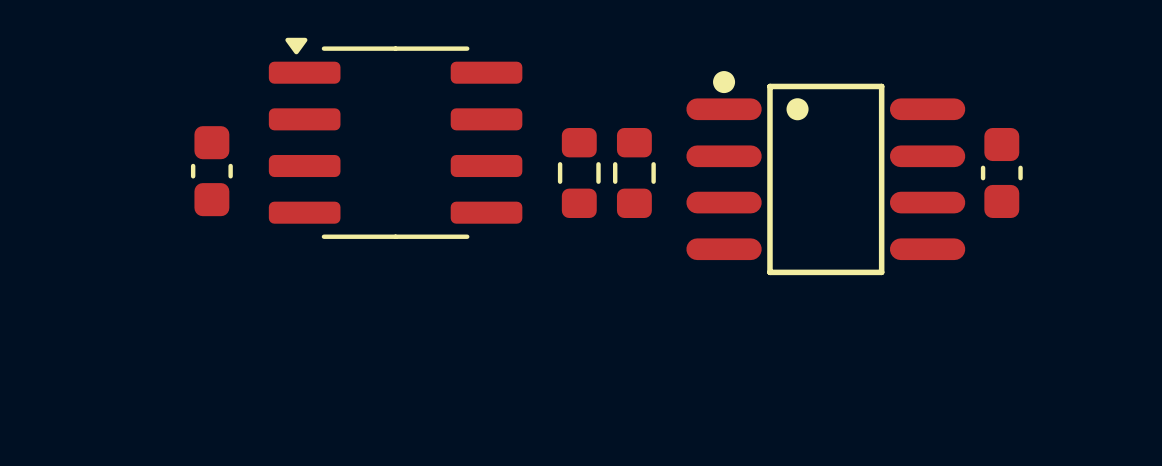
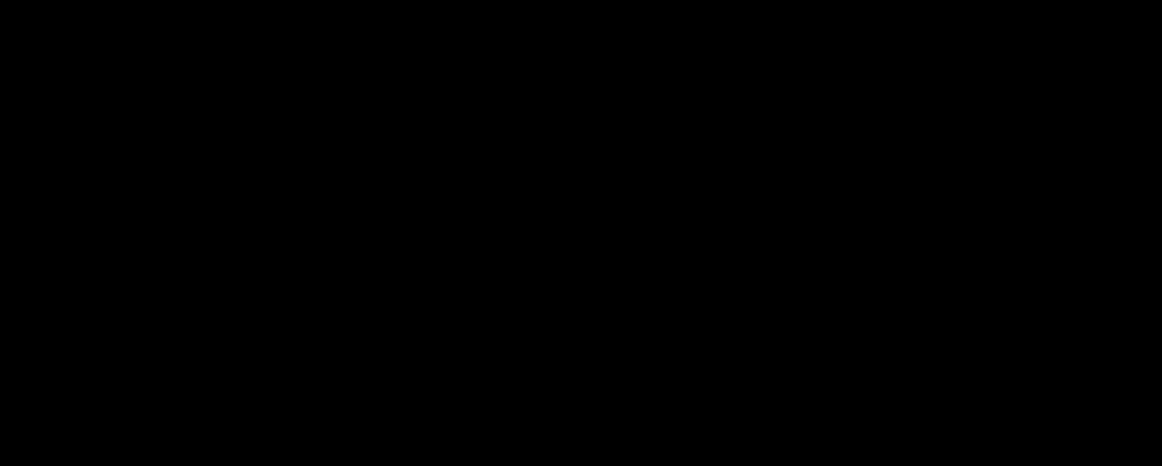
part: (395, 138) -> none
part: (211, 171) -> none
part: (579, 172) -> none
part: (634, 172) -> none
part: (1001, 172) -> none
part: (825, 173) -> none

